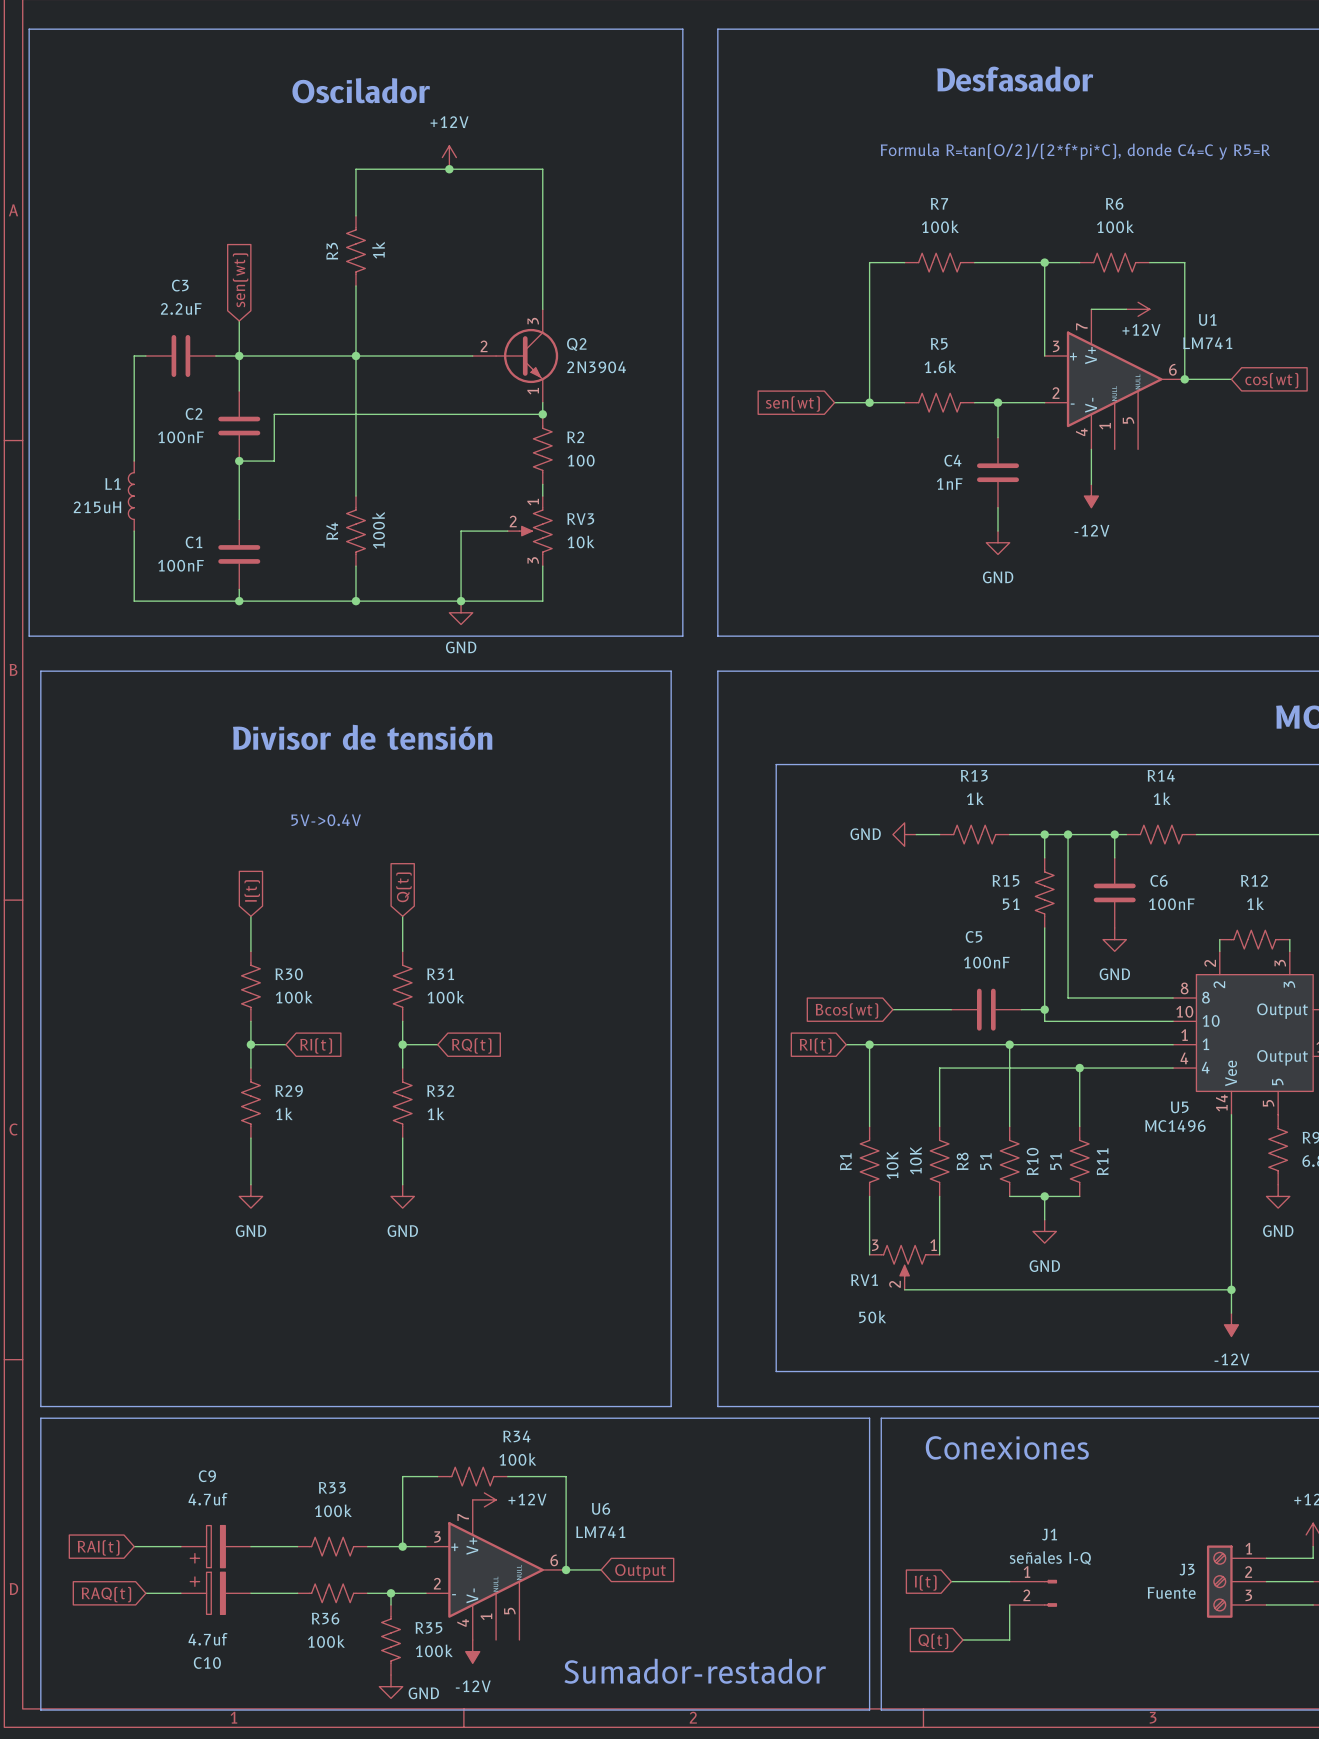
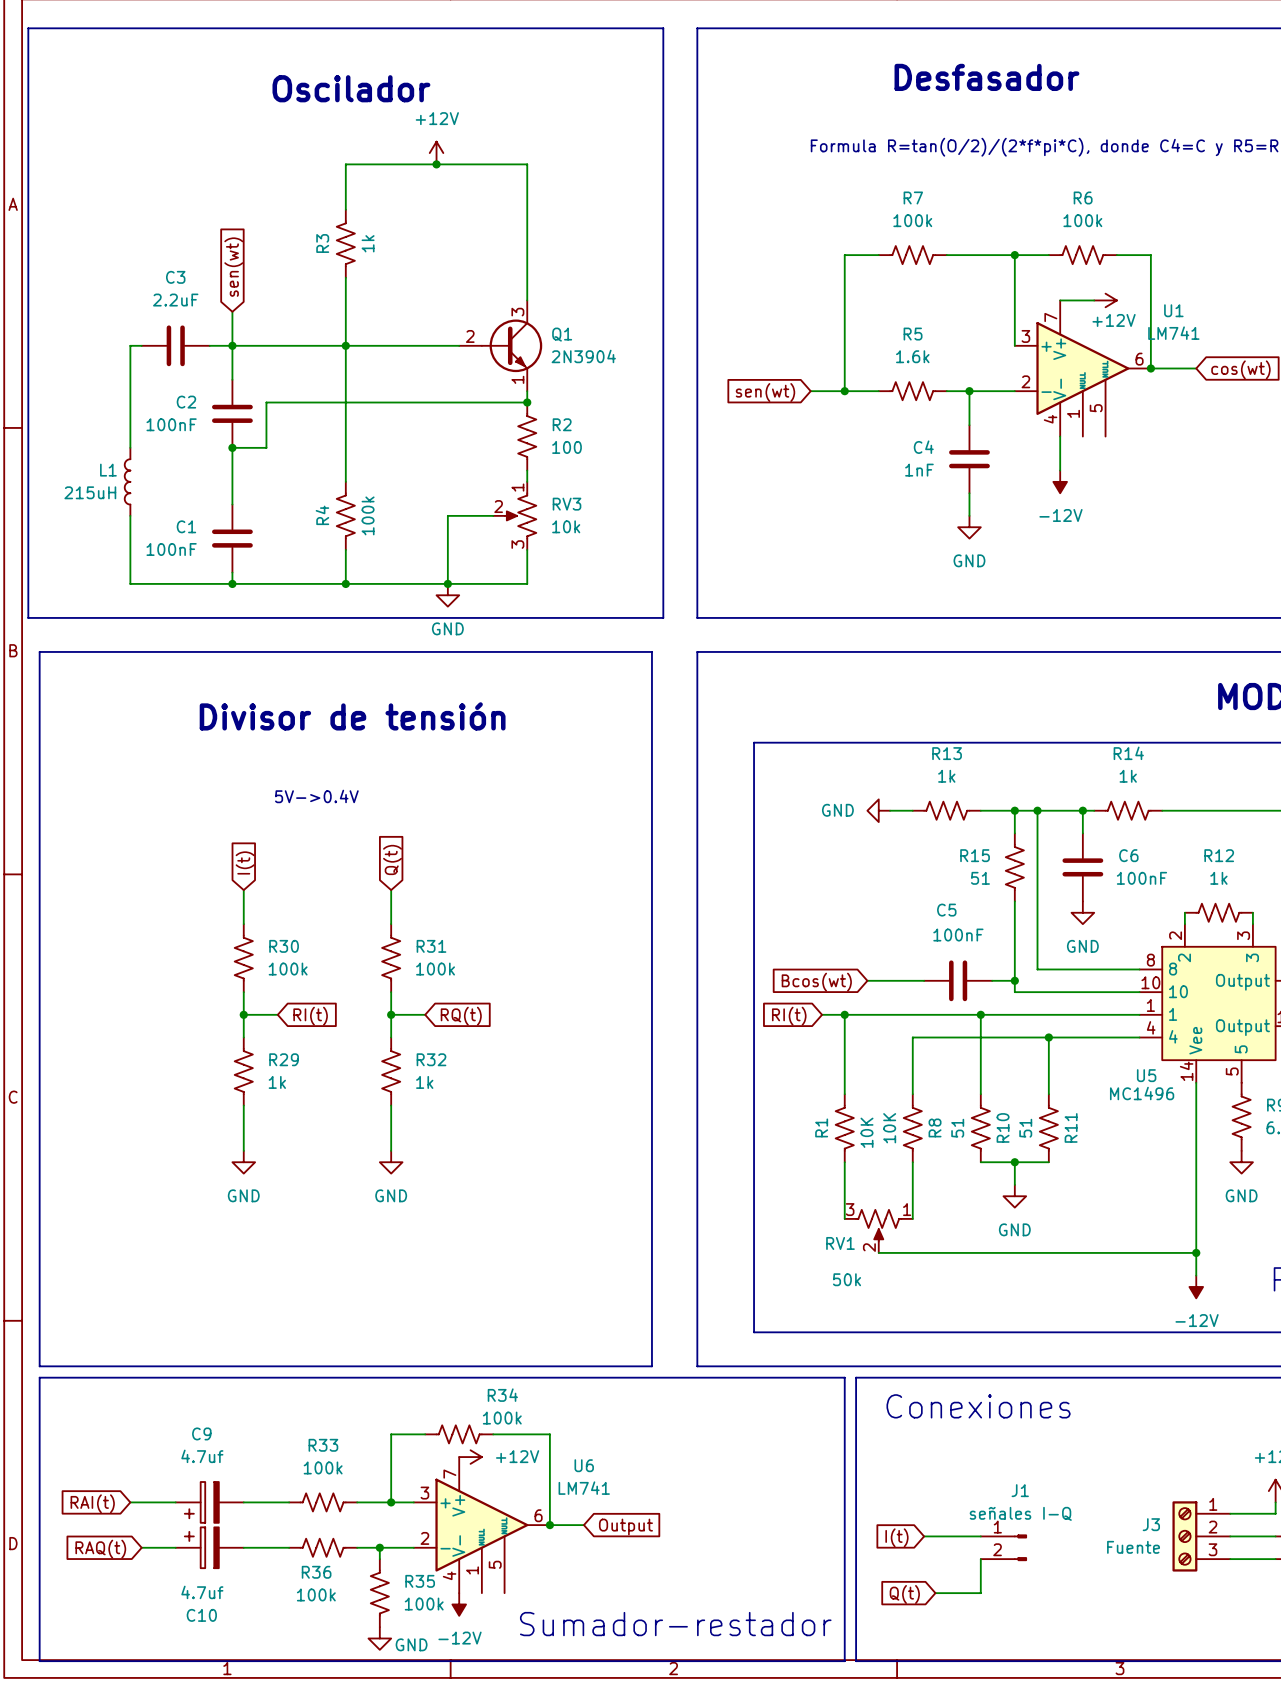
Q2 name: Q2 (576, 344) -> Q1 (562, 334)

